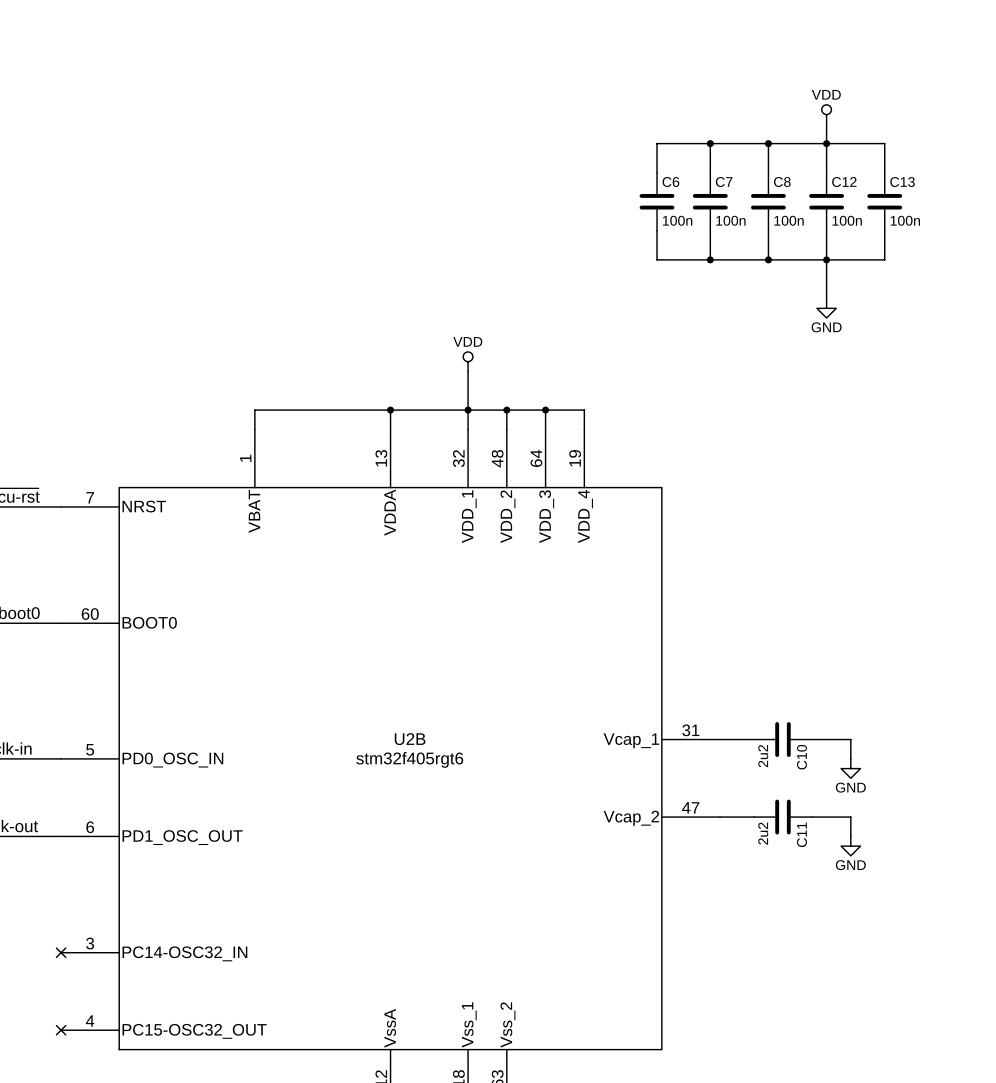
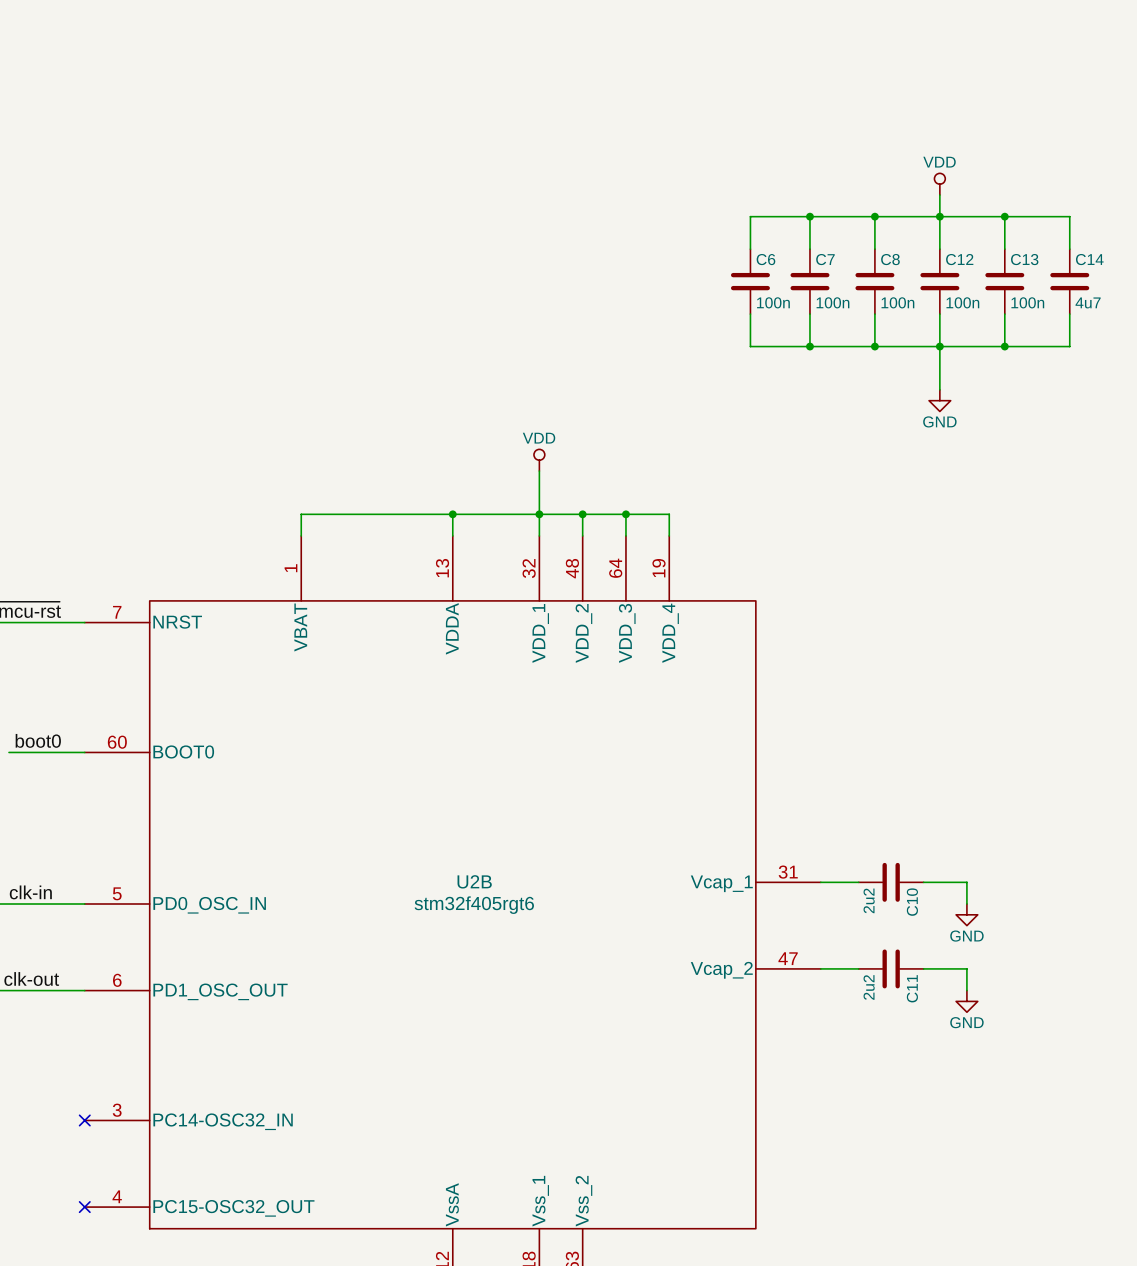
wire: none -> (1004, 216) (1069, 216) (1069, 249)
junction: none -> (1004, 216)
C14: none -> 4u7 (1069, 281)
wire: none -> (1069, 314) (1069, 346) (1004, 346)
junction: none -> (1004, 346)

